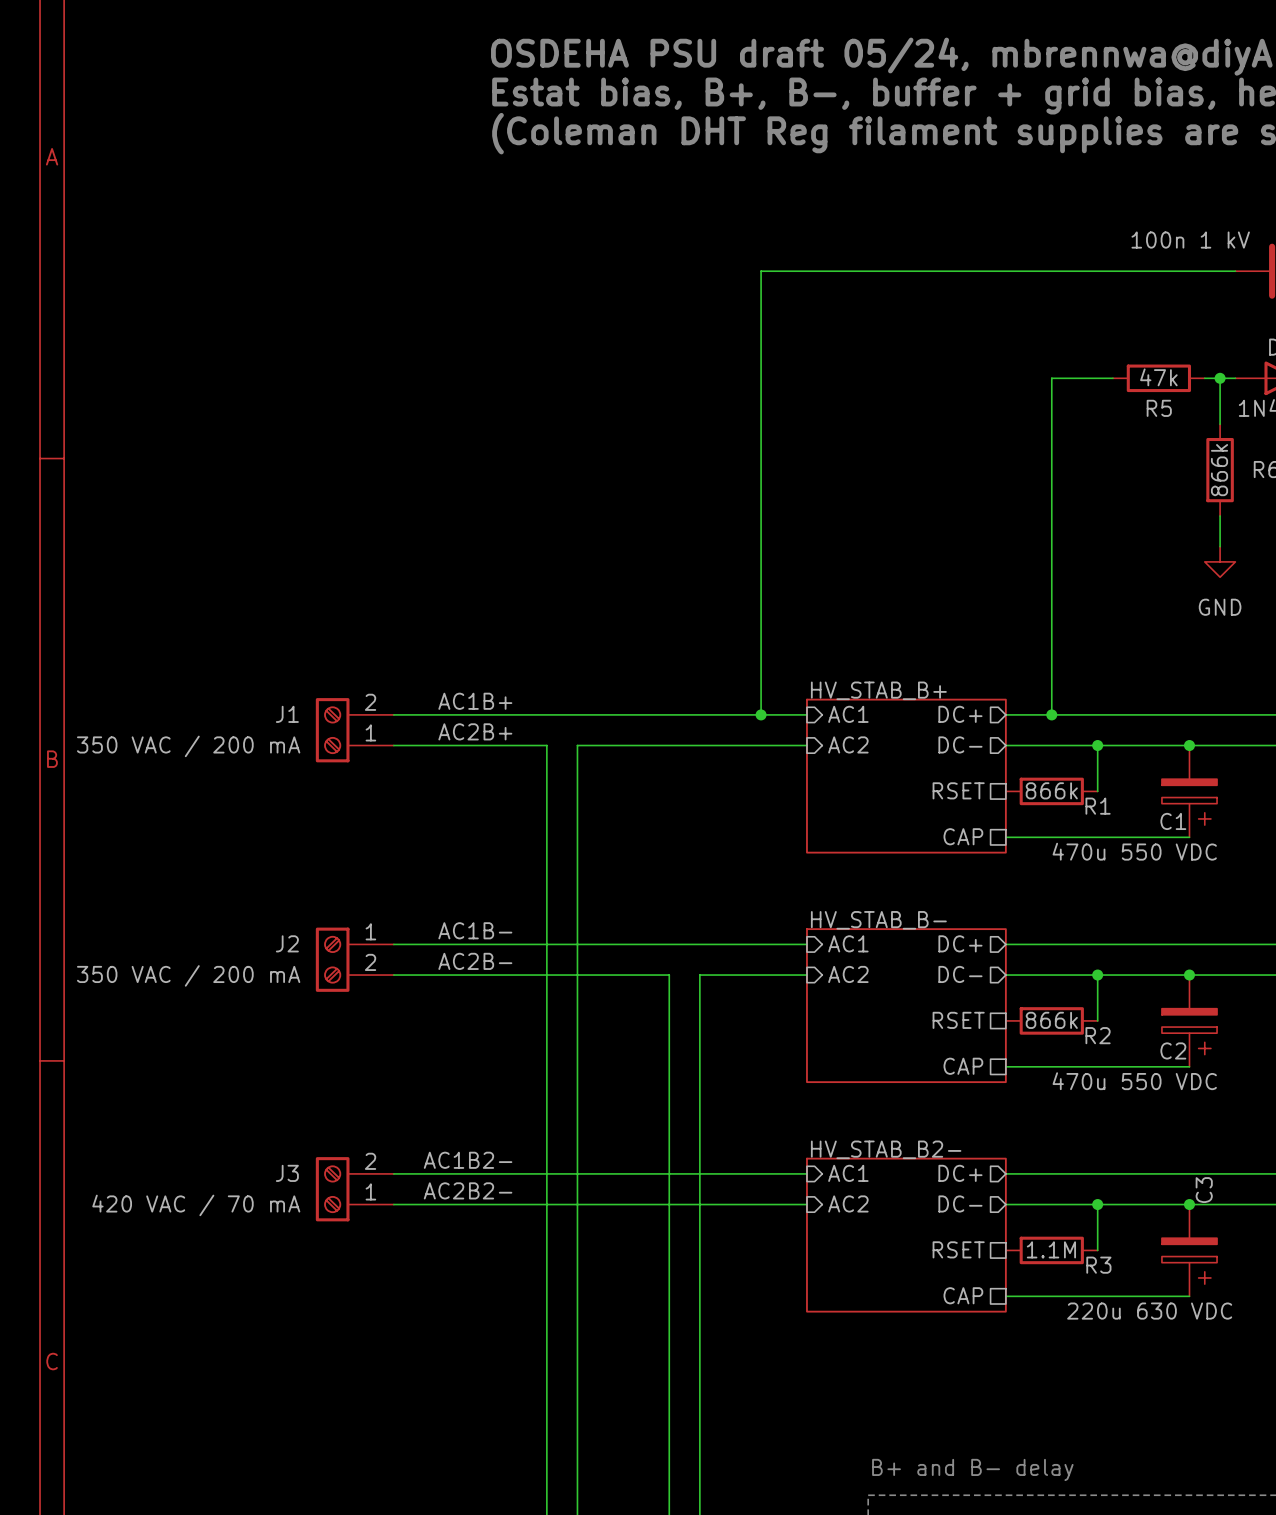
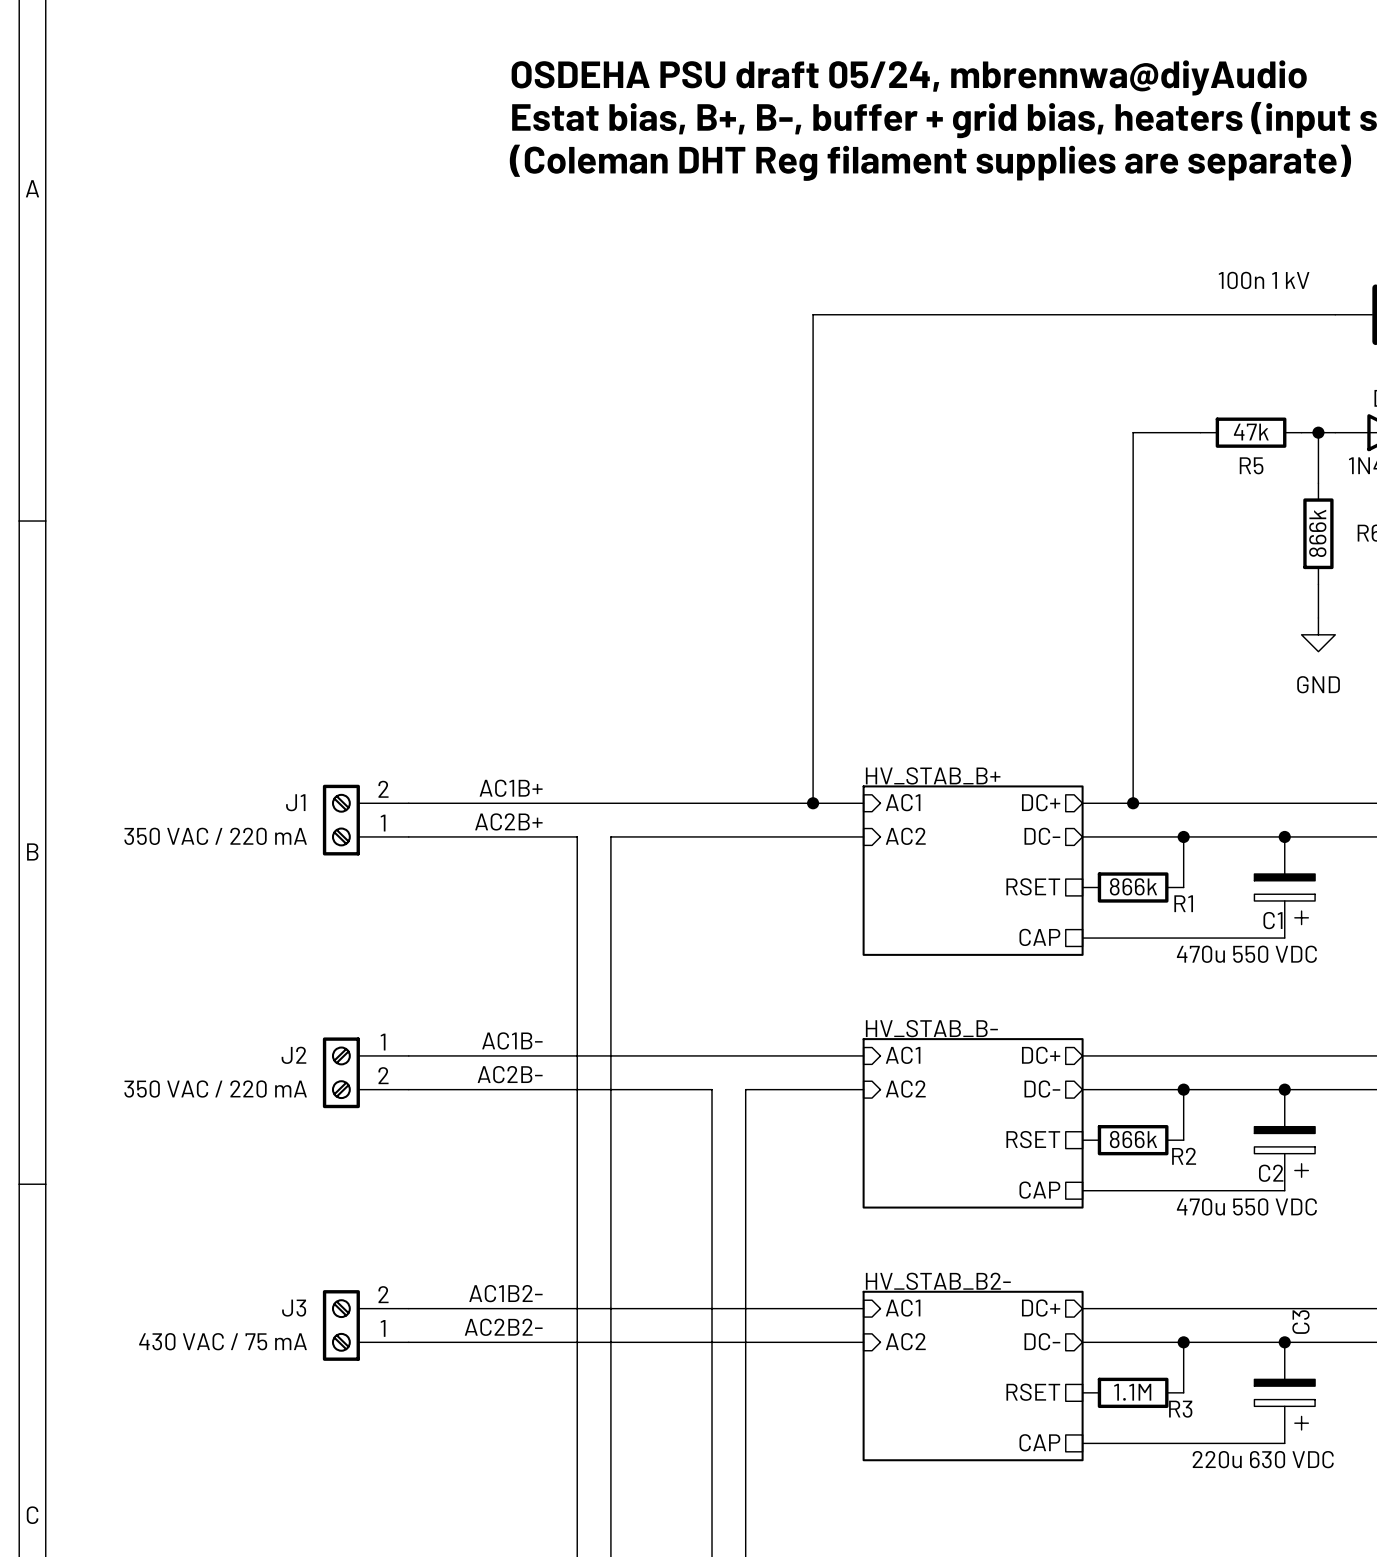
J1 value: 350 VAC / 200 mA (188, 746) -> 350 VAC / 220 mA (215, 836)
J2 value: 350 VAC / 200 mA (188, 975) -> 350 VAC / 220 mA (215, 1089)
J3 value: 420 VAC / 70 mA (196, 1205) -> 430 VAC / 75 mA (222, 1341)

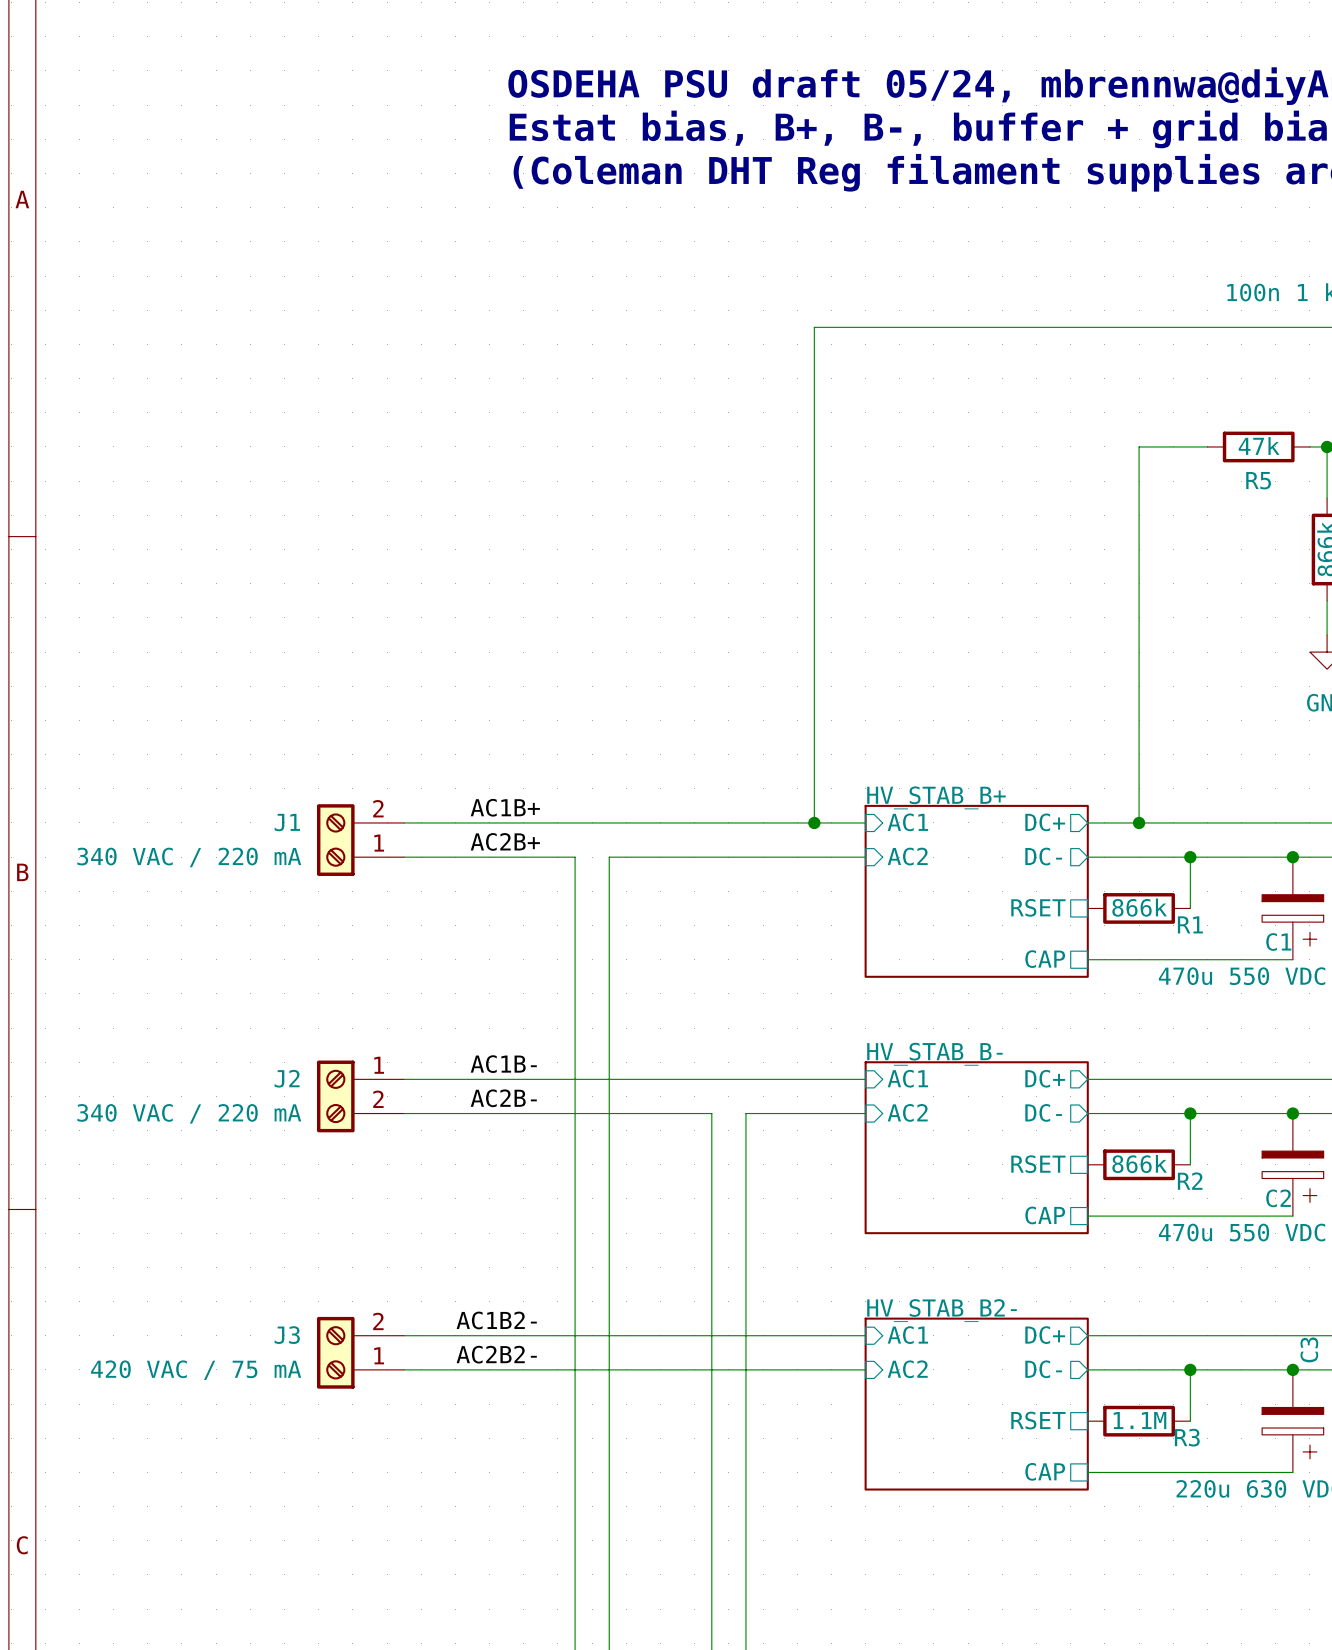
J1 value: 350 VAC / 220 mA (215, 836) -> 340 VAC / 220 mA (189, 857)
J2 value: 350 VAC / 220 mA (215, 1089) -> 340 VAC / 220 mA (189, 1113)
J3 value: 430 VAC / 75 mA (222, 1341) -> 420 VAC / 75 mA (196, 1370)

